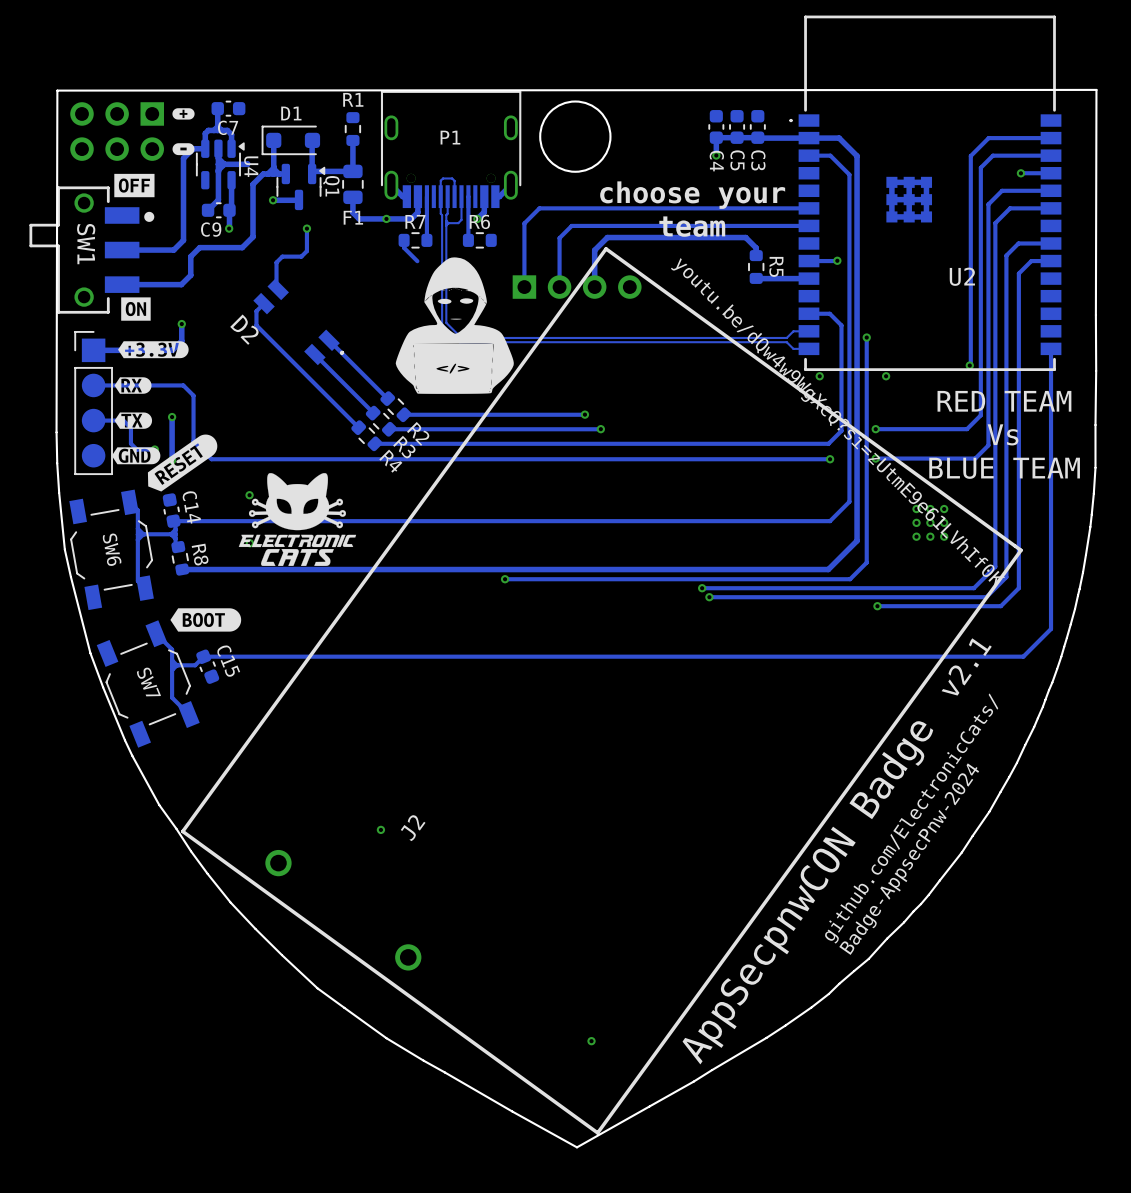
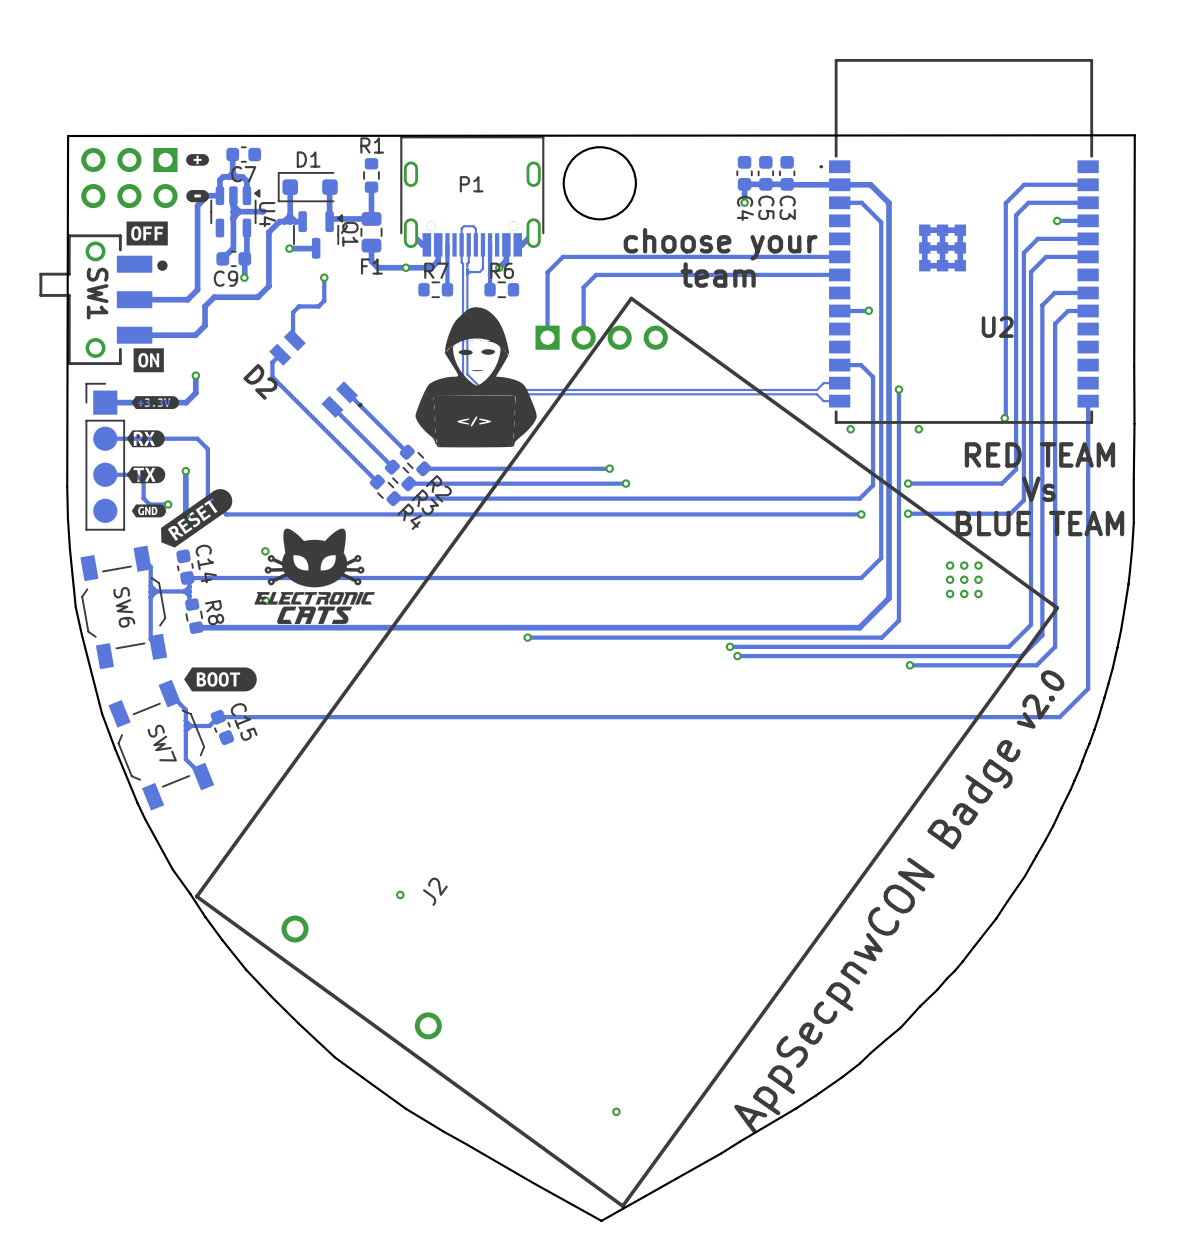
track: (404, 240) (404, 247) (417, 261) -> none
track: (756, 255) (756, 248) (745, 237) (607, 237) (594, 250) (594, 287) -> none
R5: (756, 267) -> none
track: (756, 278) (808, 278) -> none
drawing shape: [118, 341, 189, 359] -> [131, 396, 179, 410]
text: youtu.be/dQw4w9WgXcQ?si=zUtmE9e61LVhIf0K (838, 422) -> none
drawing shape: [111, 447, 161, 465] -> [131, 504, 166, 518]
text: v2.1 (966, 666) -> v2.0 (1040, 699)
text: github.com/ElectronicCats/ (911, 818) -> none
text: Badge-AppsecPnw-2024 (909, 859) -> none
text position: AppSecpnwCON Badge (807, 892) -> AppSecpnwCON Badge (877, 936)

